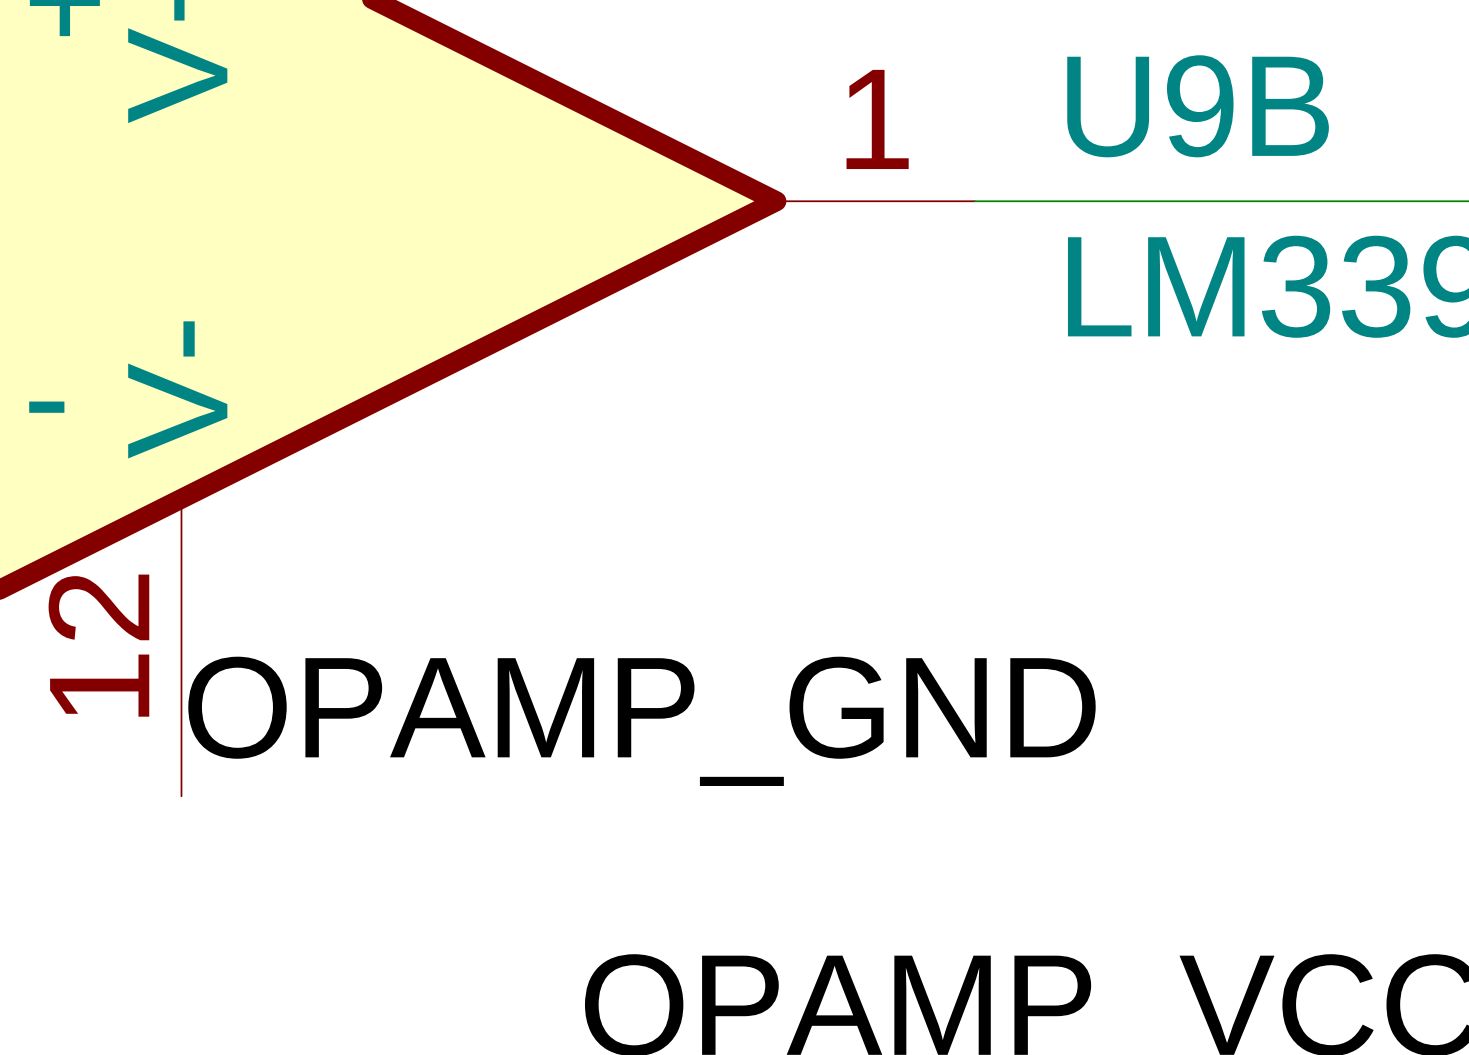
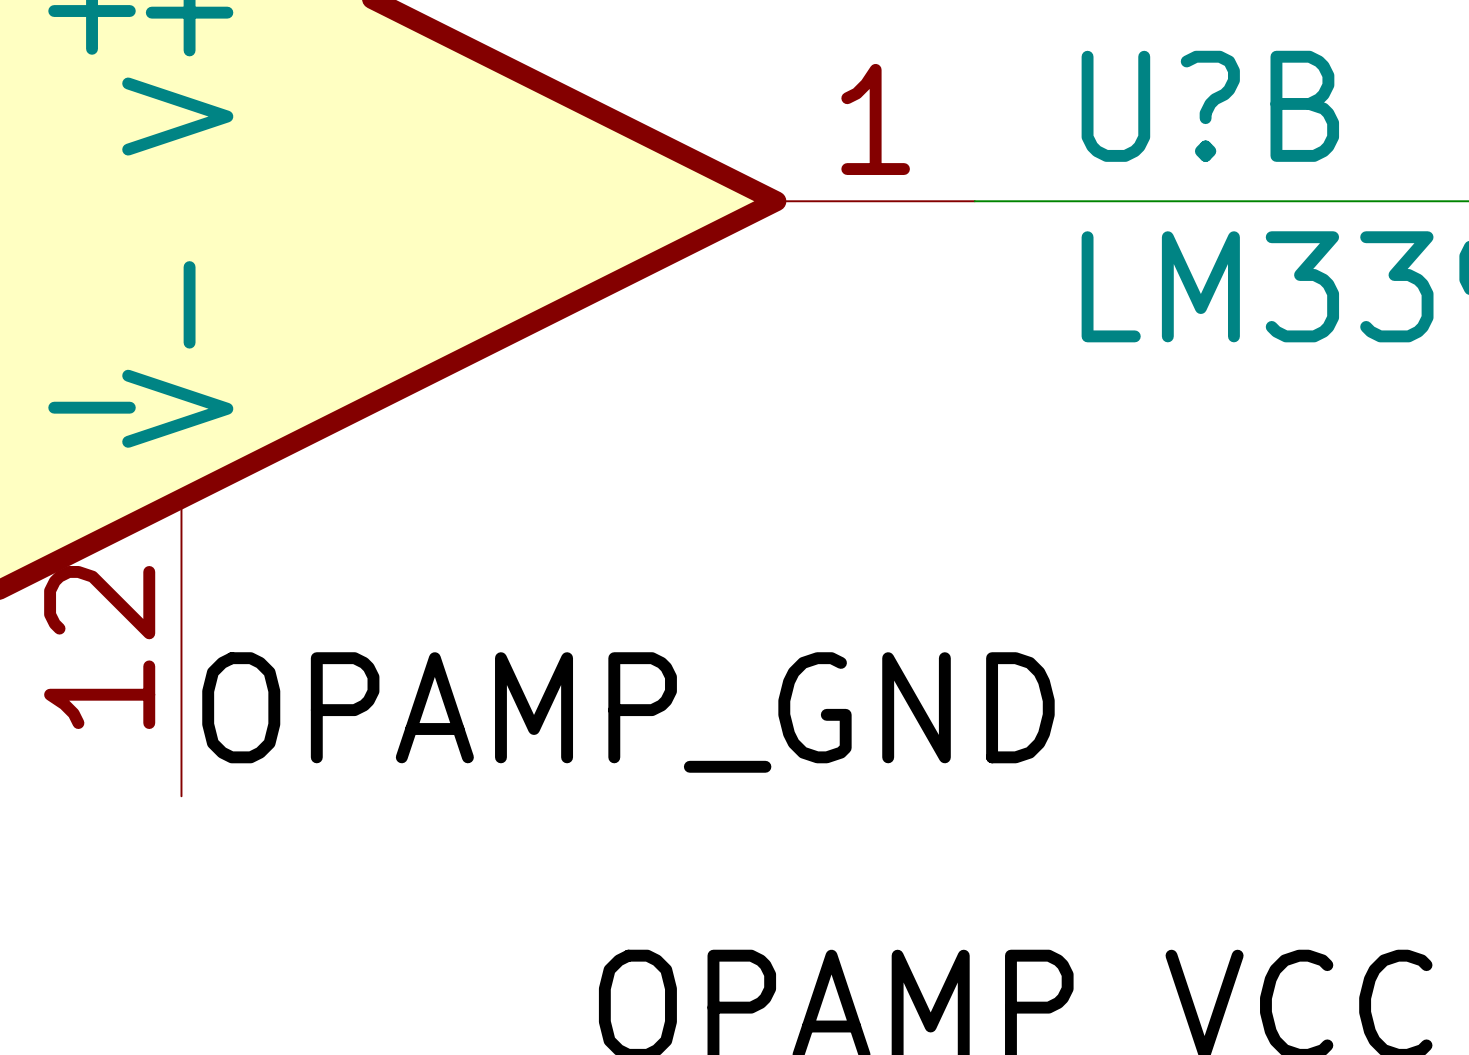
U9B name: U9B (1198, 106) -> U?B (1210, 106)

